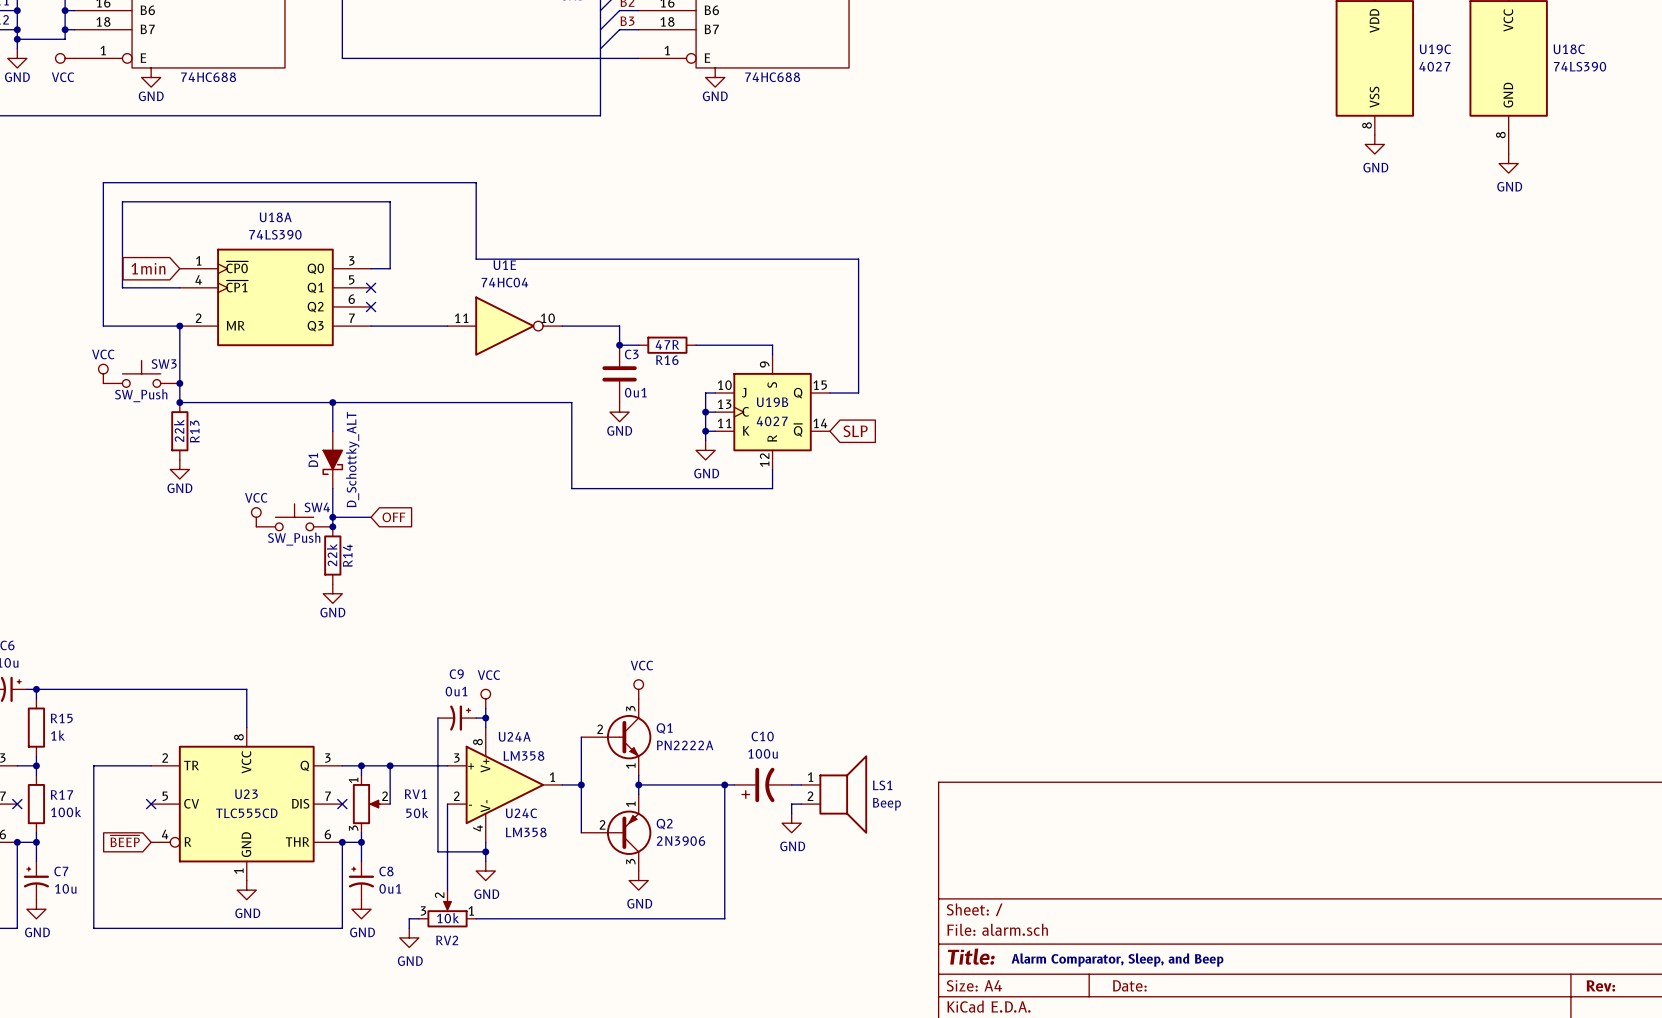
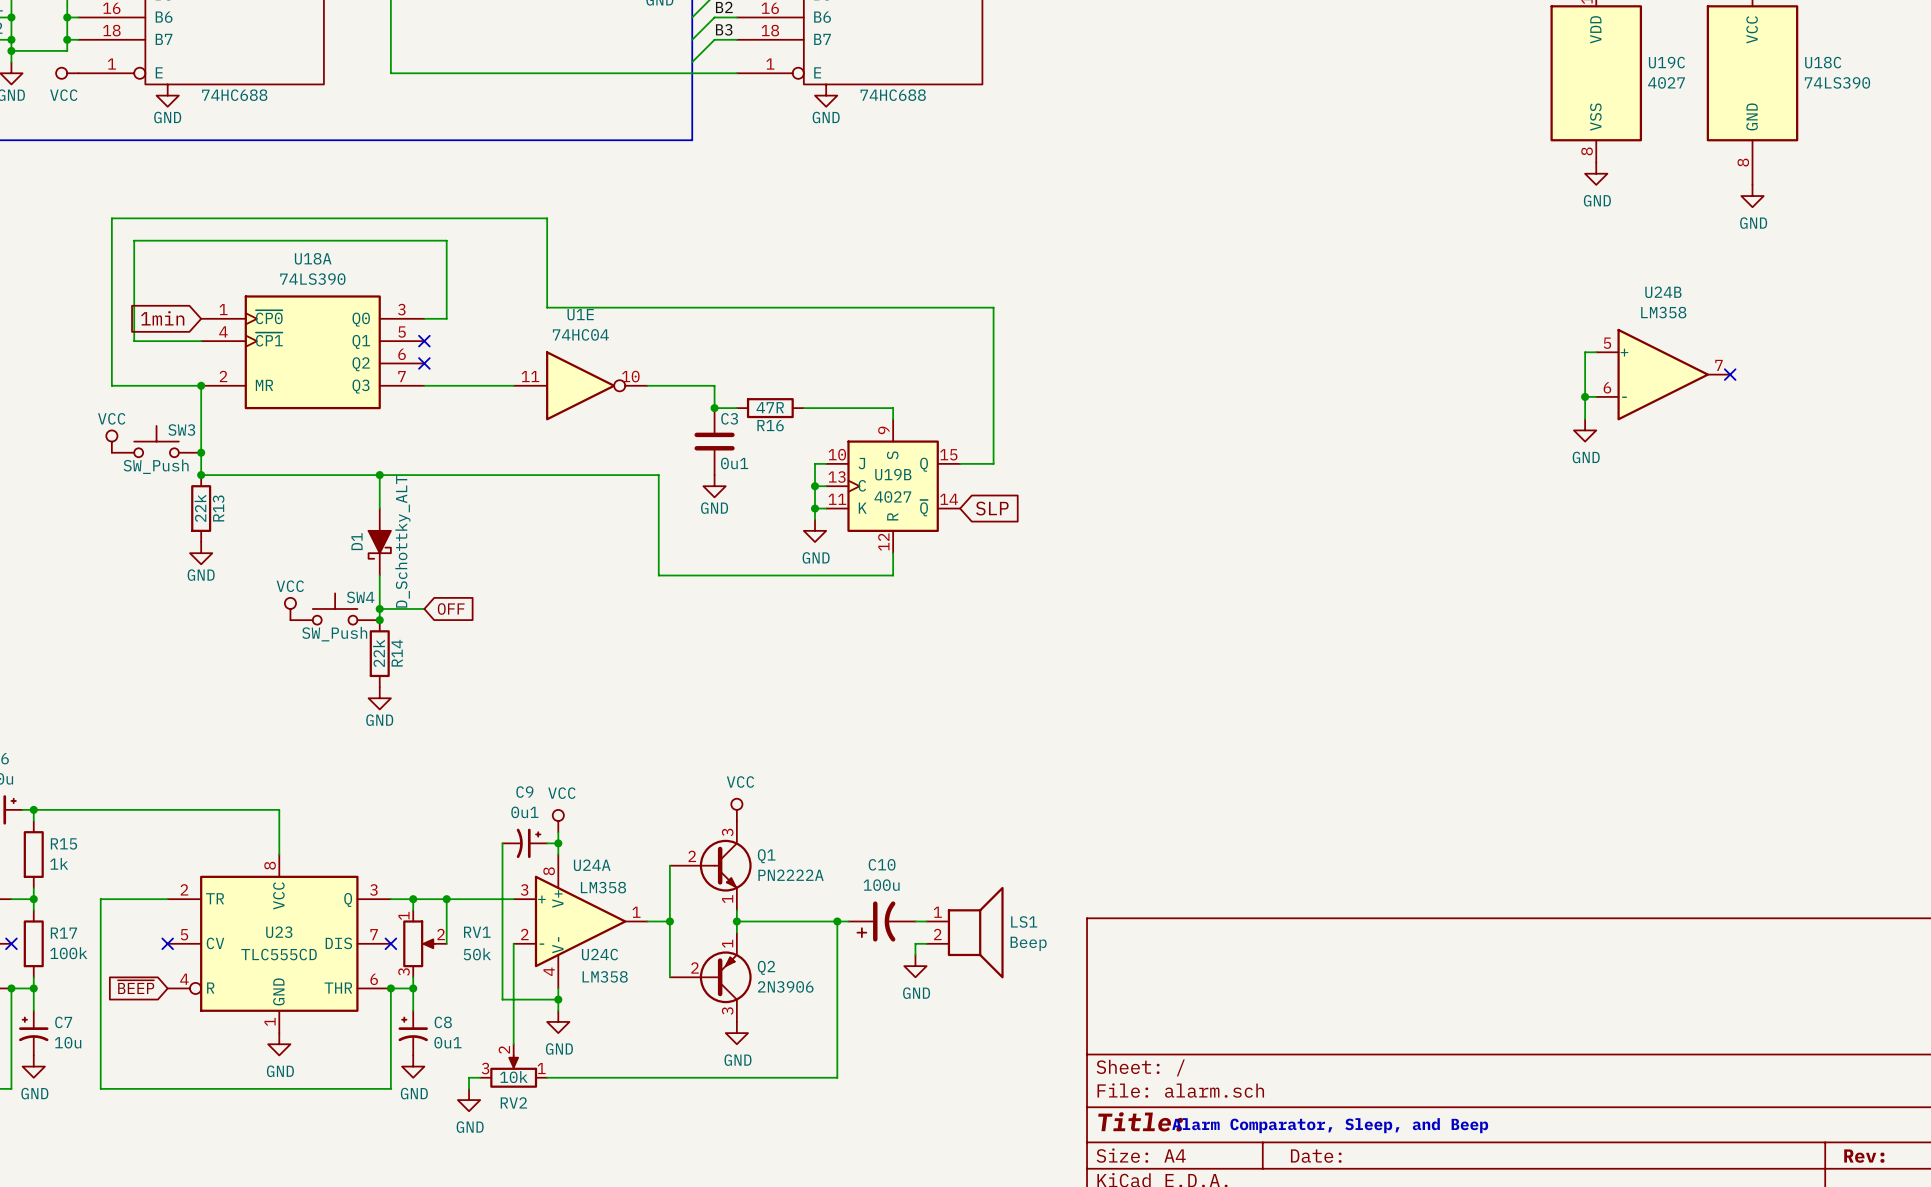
wire: none -> (1596, 352) (1585, 352) (1585, 419)
U24B: none -> LM358 (1663, 374)
no-connect mark: none -> (1730, 374)
wire: none -> (1585, 396) (1596, 396)
junction: none -> (1585, 396)
power symbol: none -> GND (1585, 430)

